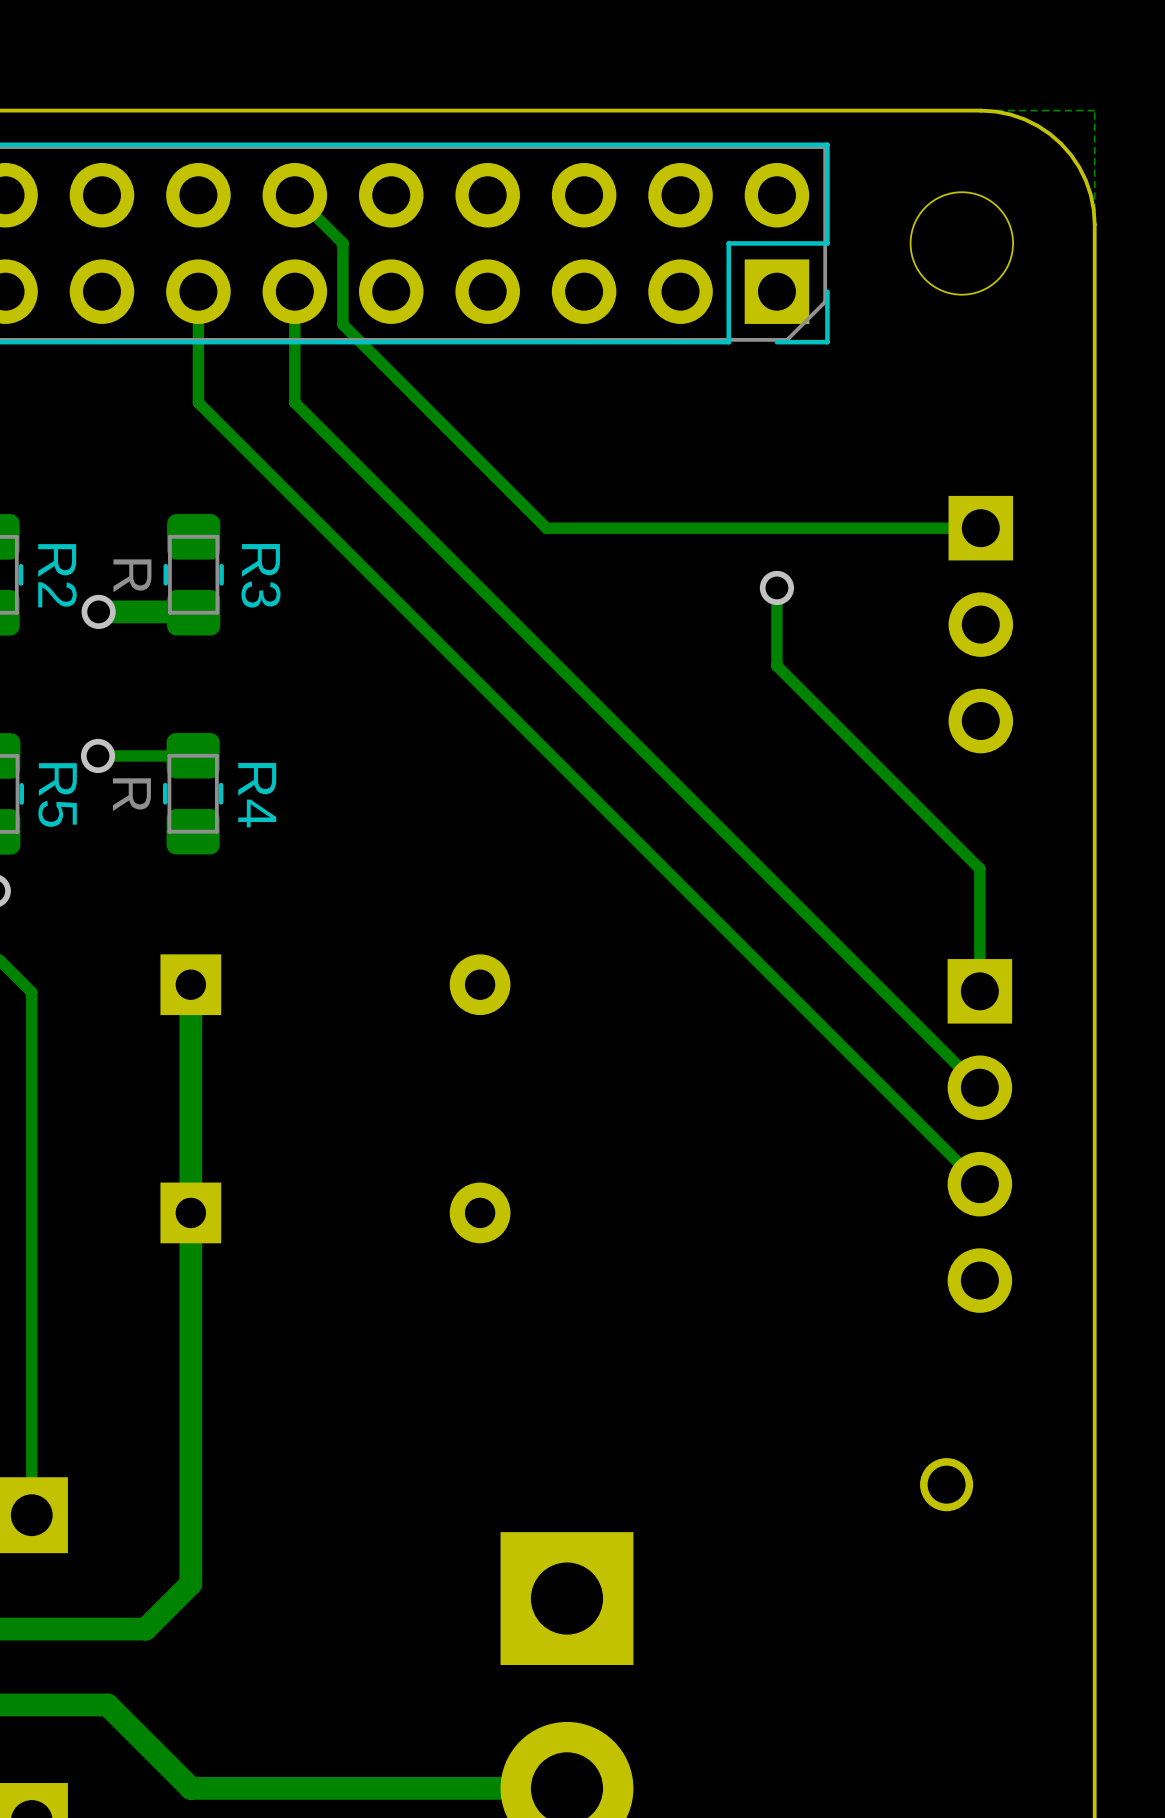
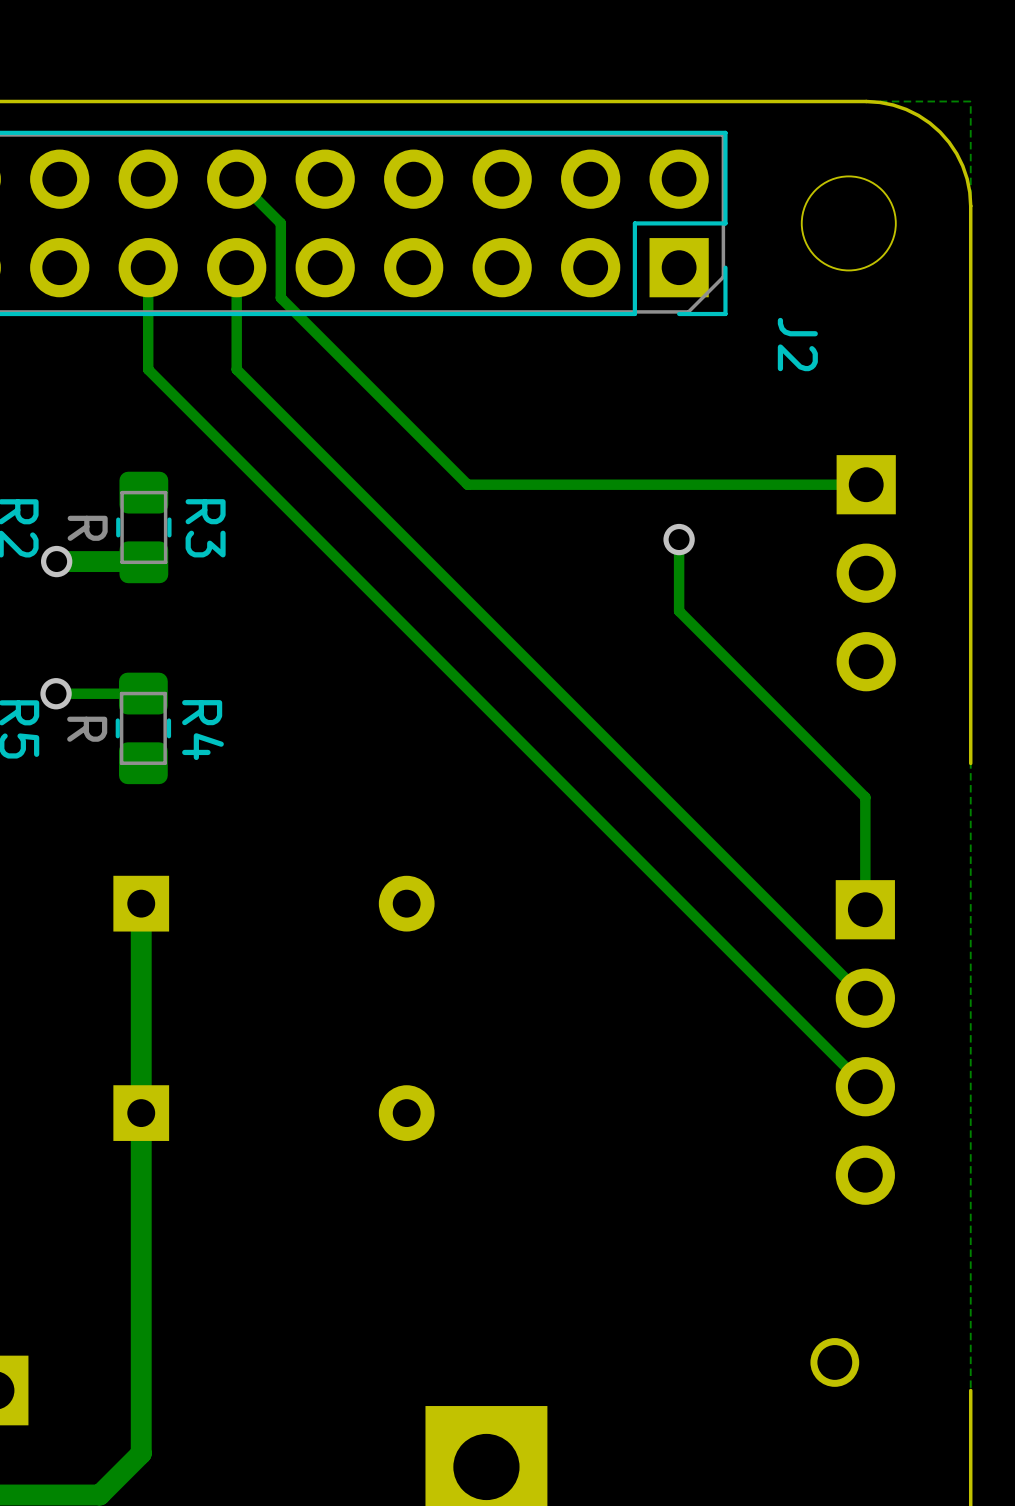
J2 name: none -> J2 (797, 344)
board edge: (1094, 831) (1094, 1515) -> none

